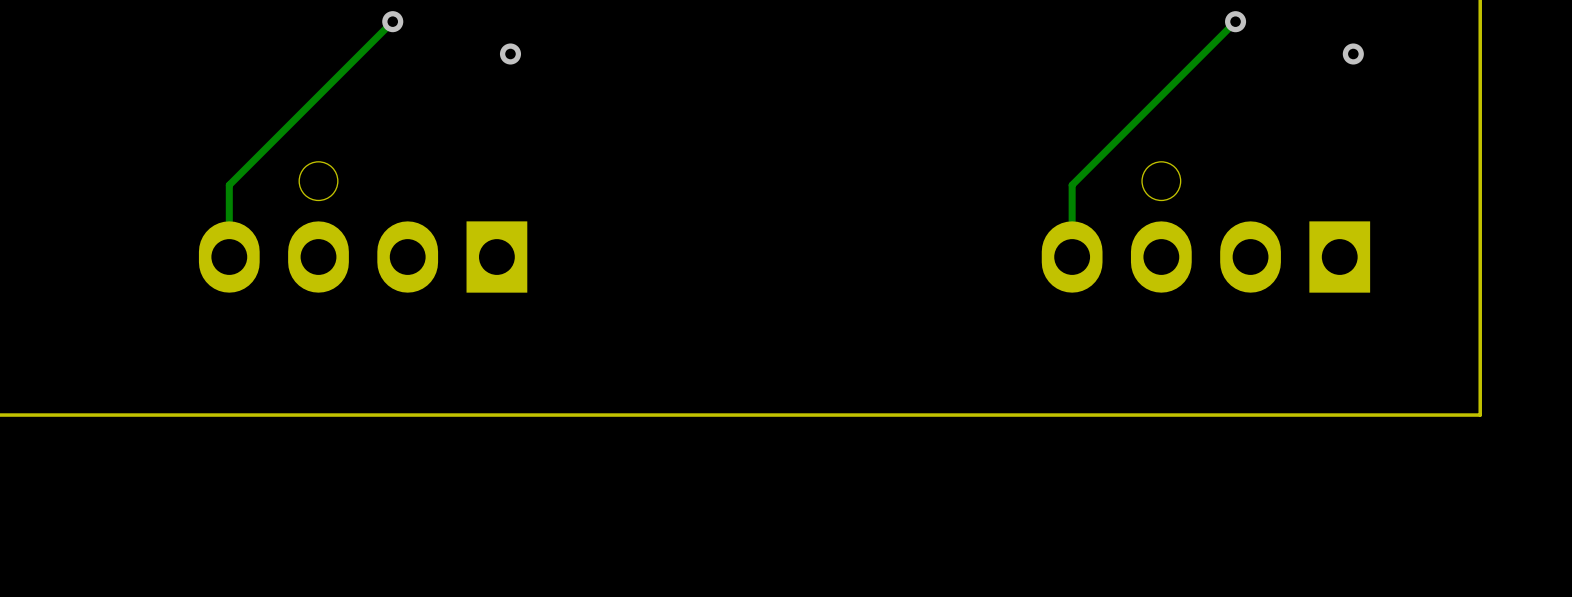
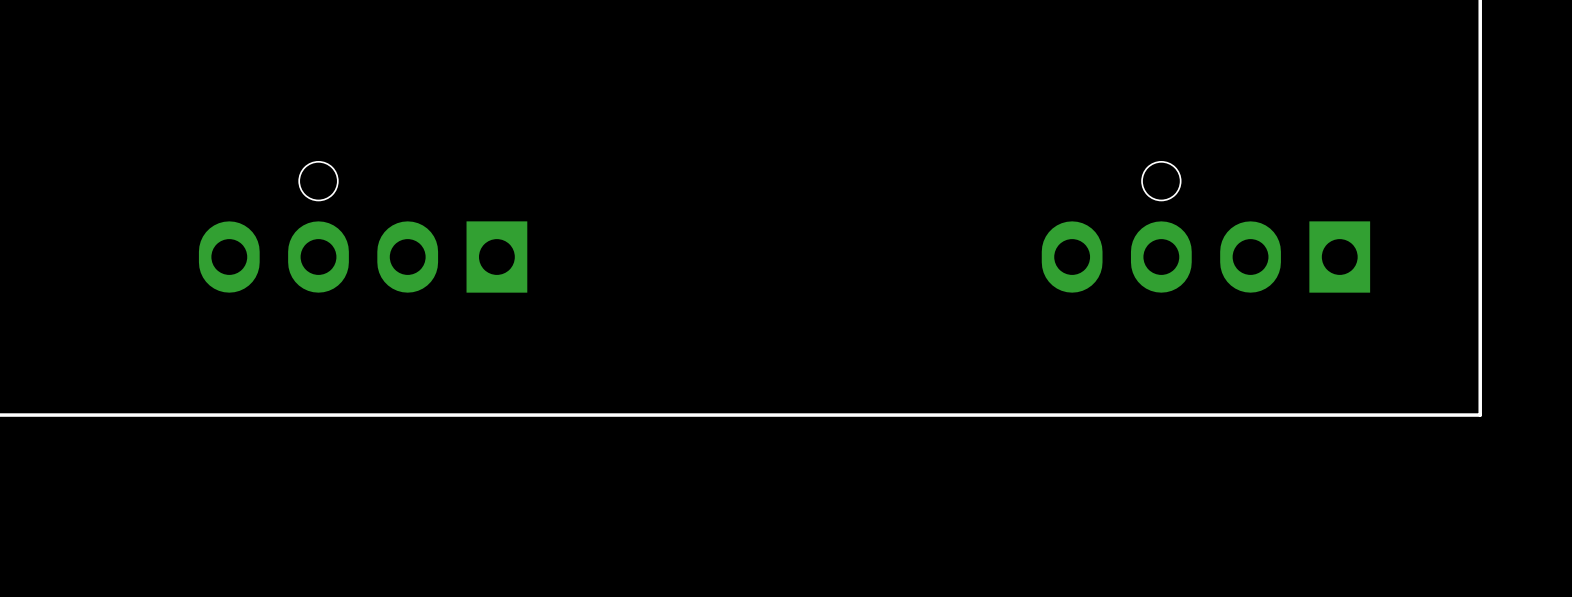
track: (392, 21) (229, 185) (229, 257) -> none
via: (392, 21) -> none
track: (1235, 21) (1072, 185) (1072, 257) -> none
via: (1235, 21) -> none
via: (510, 54) -> none
via: (1353, 54) -> none

